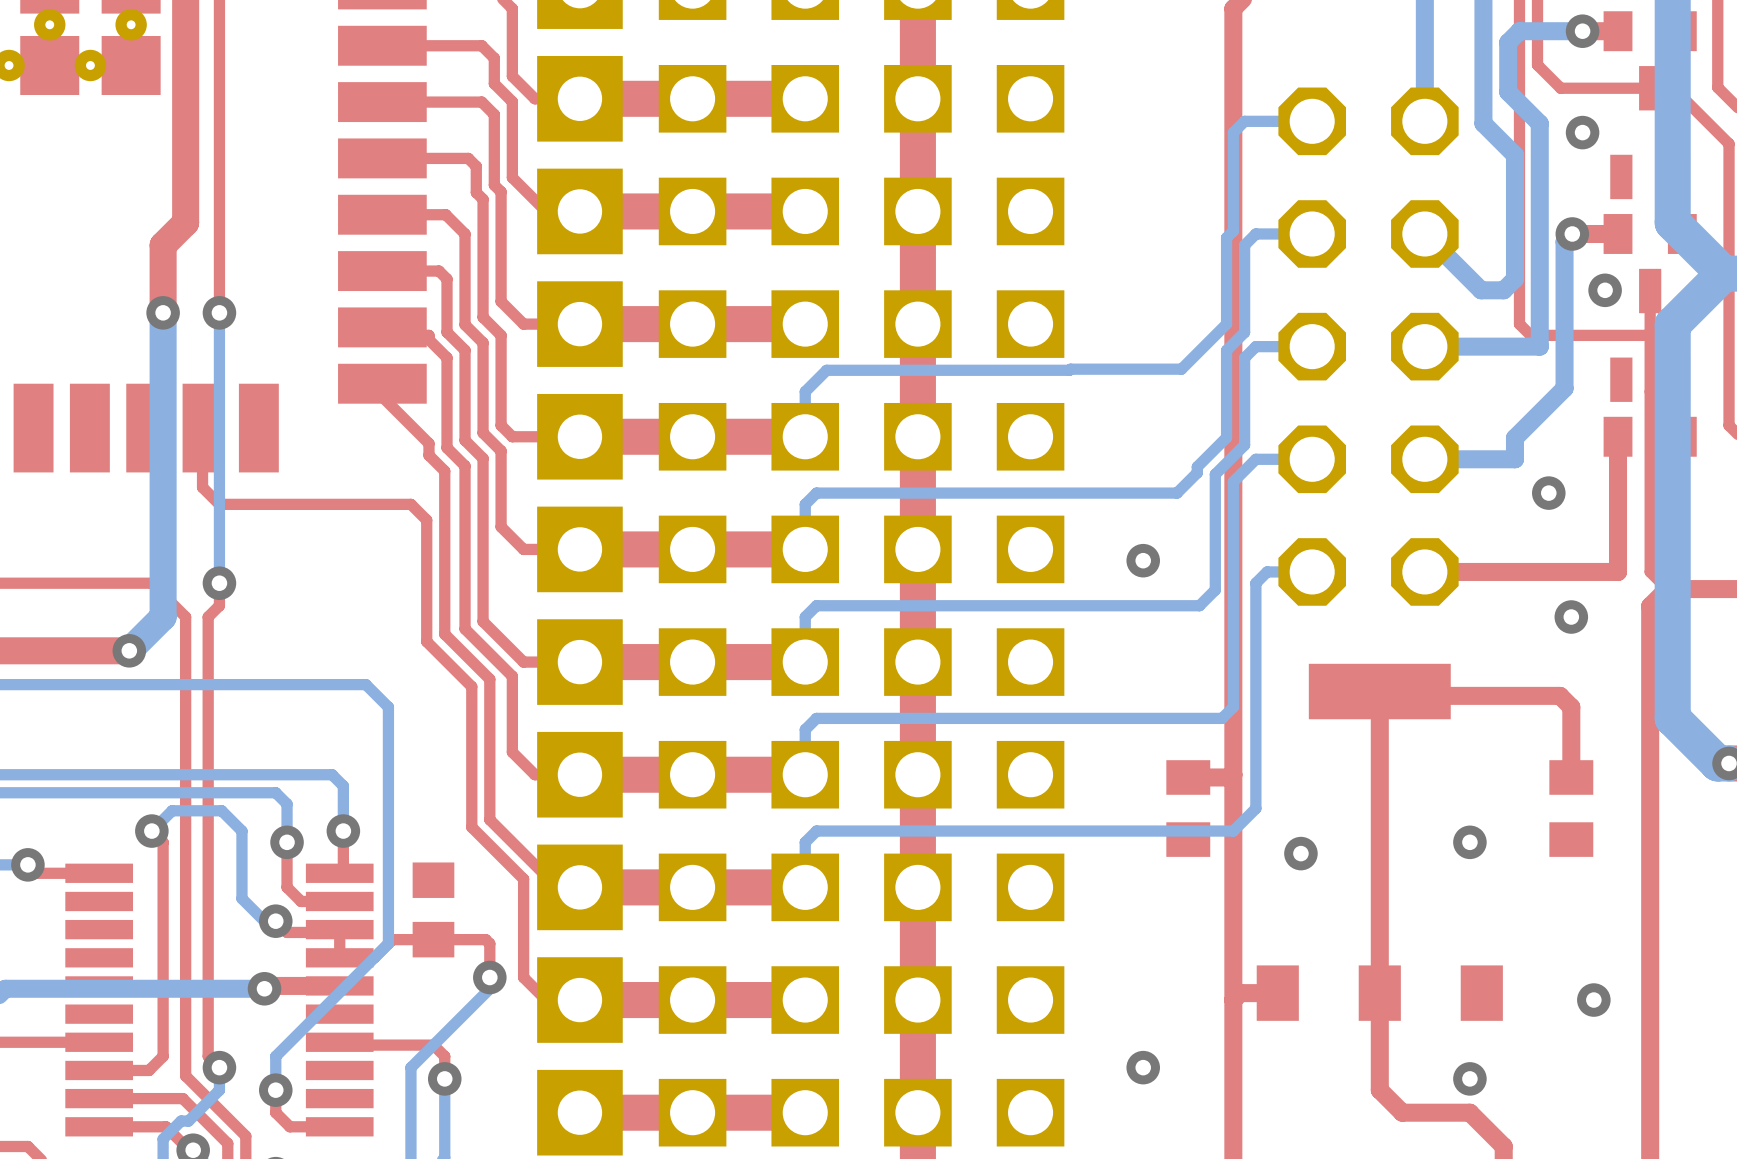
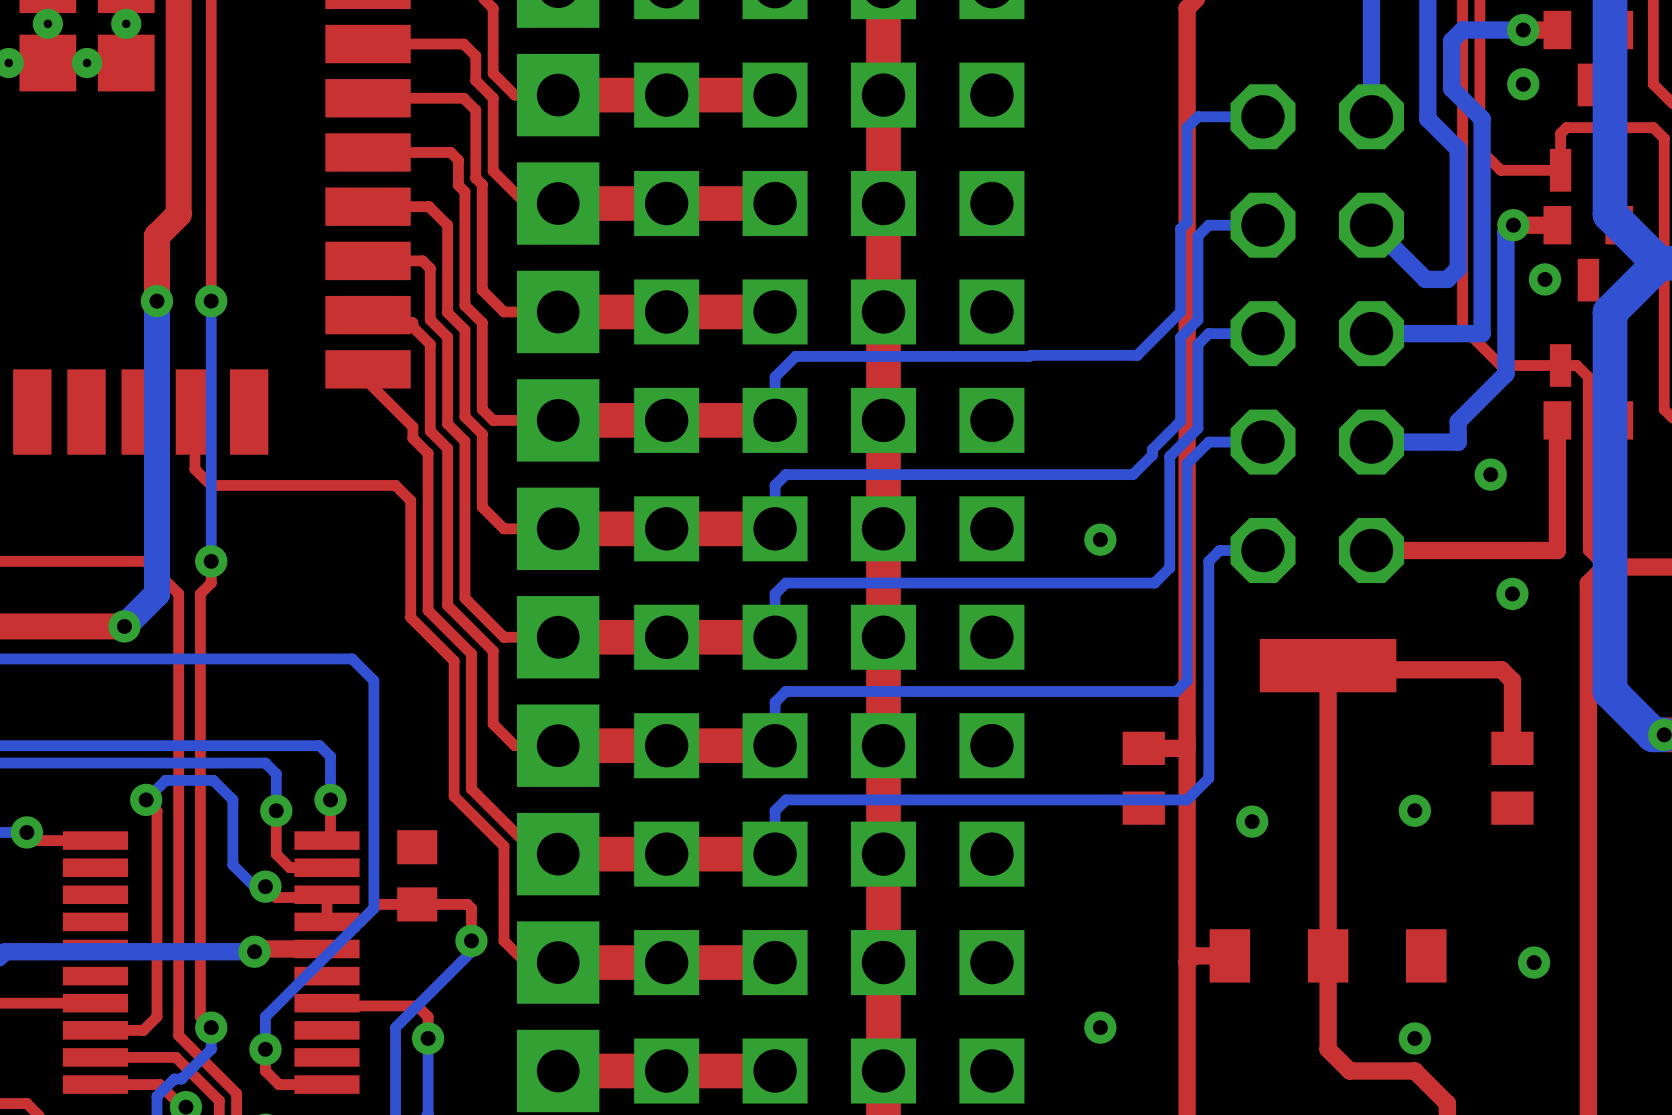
top track: (1537, 65) (1560, 88) (1673, 88) (1717, 132) -> (1479, 62) (1479, 149) (1500, 170) (1560, 170) (1560, 133) (1566, 127) (1653, 127)
via position: (1582, 132) -> (1523, 84)
top track: (1650, 291) (1650, 391) -> none
top track: (1519, 324) (1530, 335) (1650, 335) -> (1462, 311) (1462, 327) (1501, 366) (1576, 365) (1588, 377)

